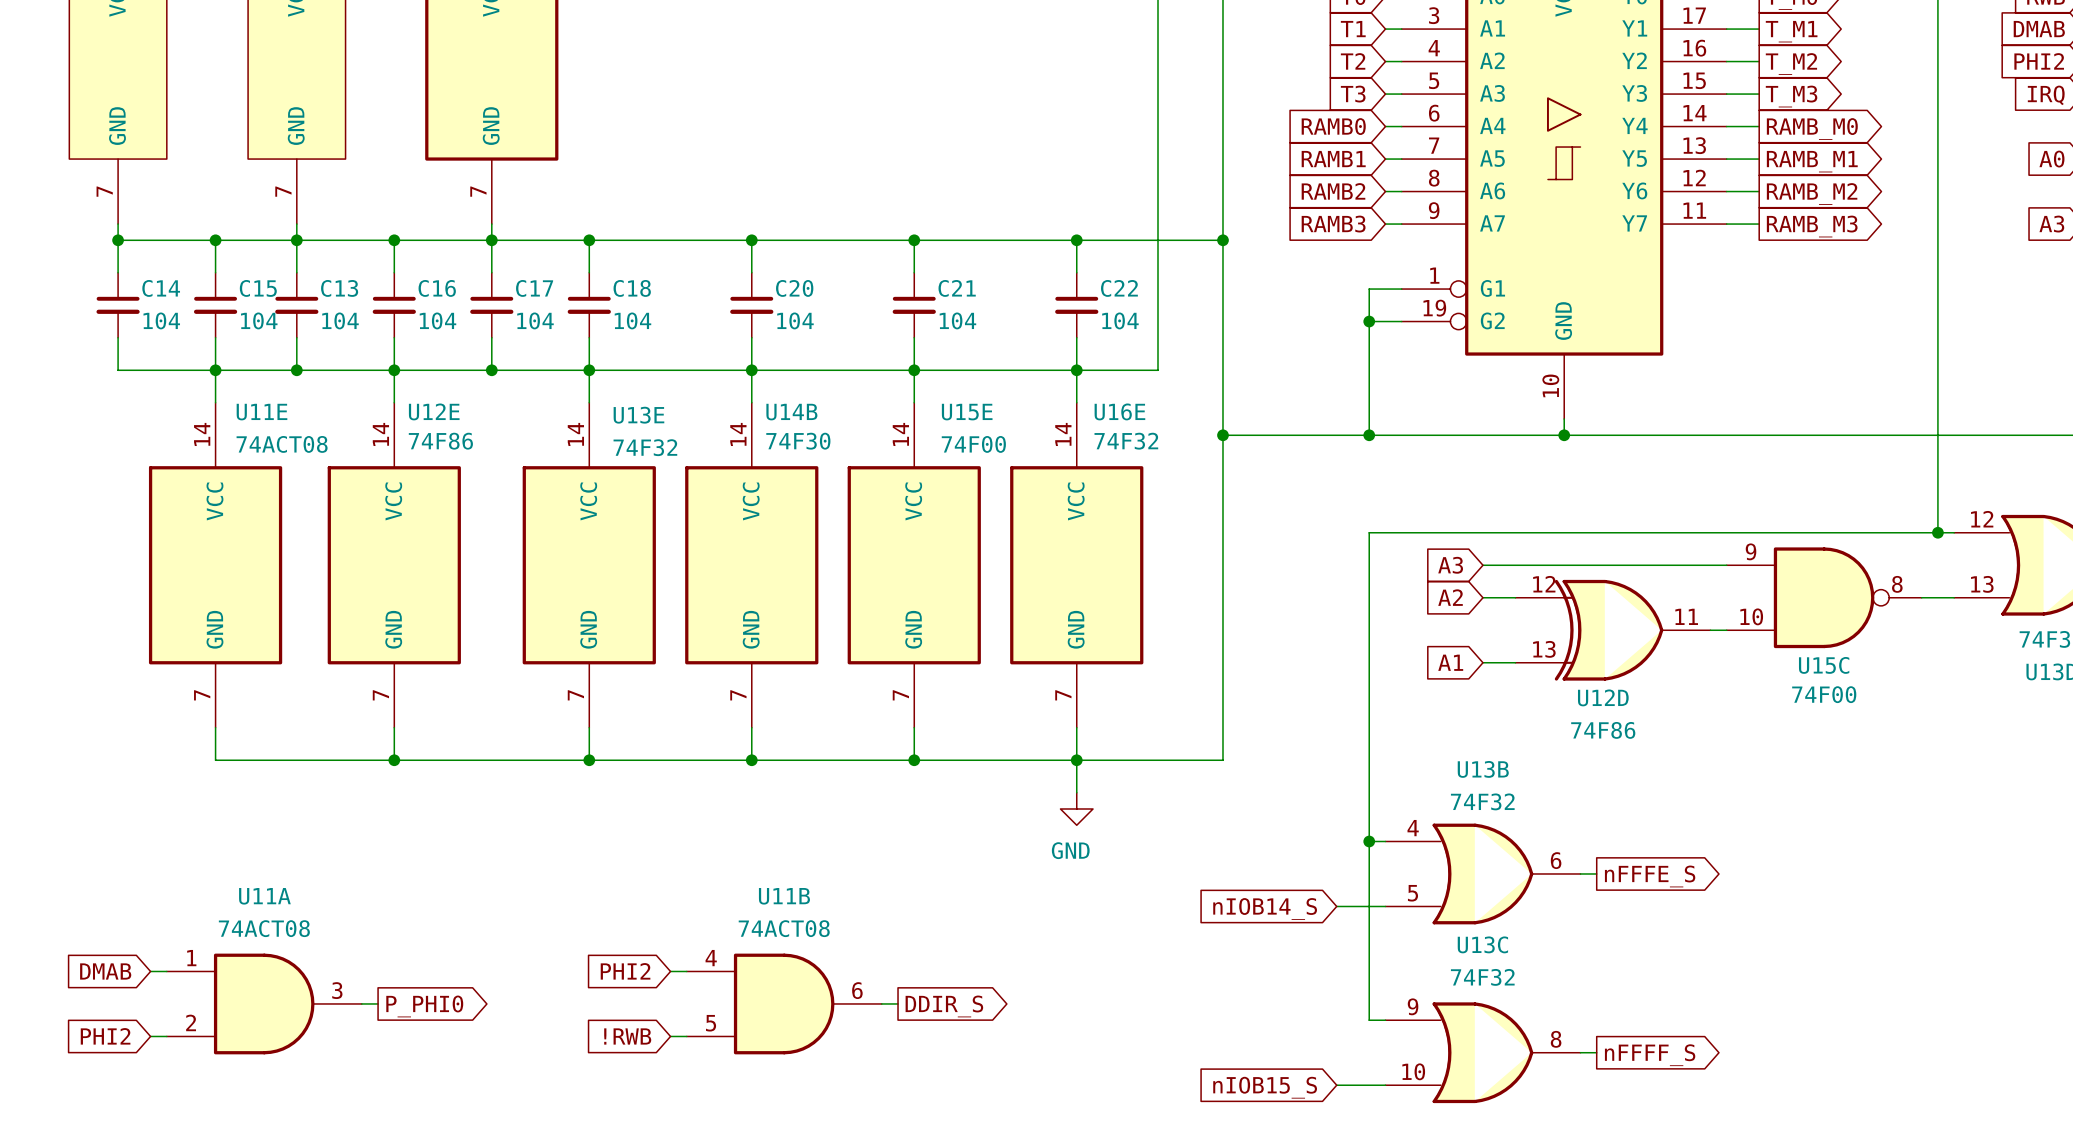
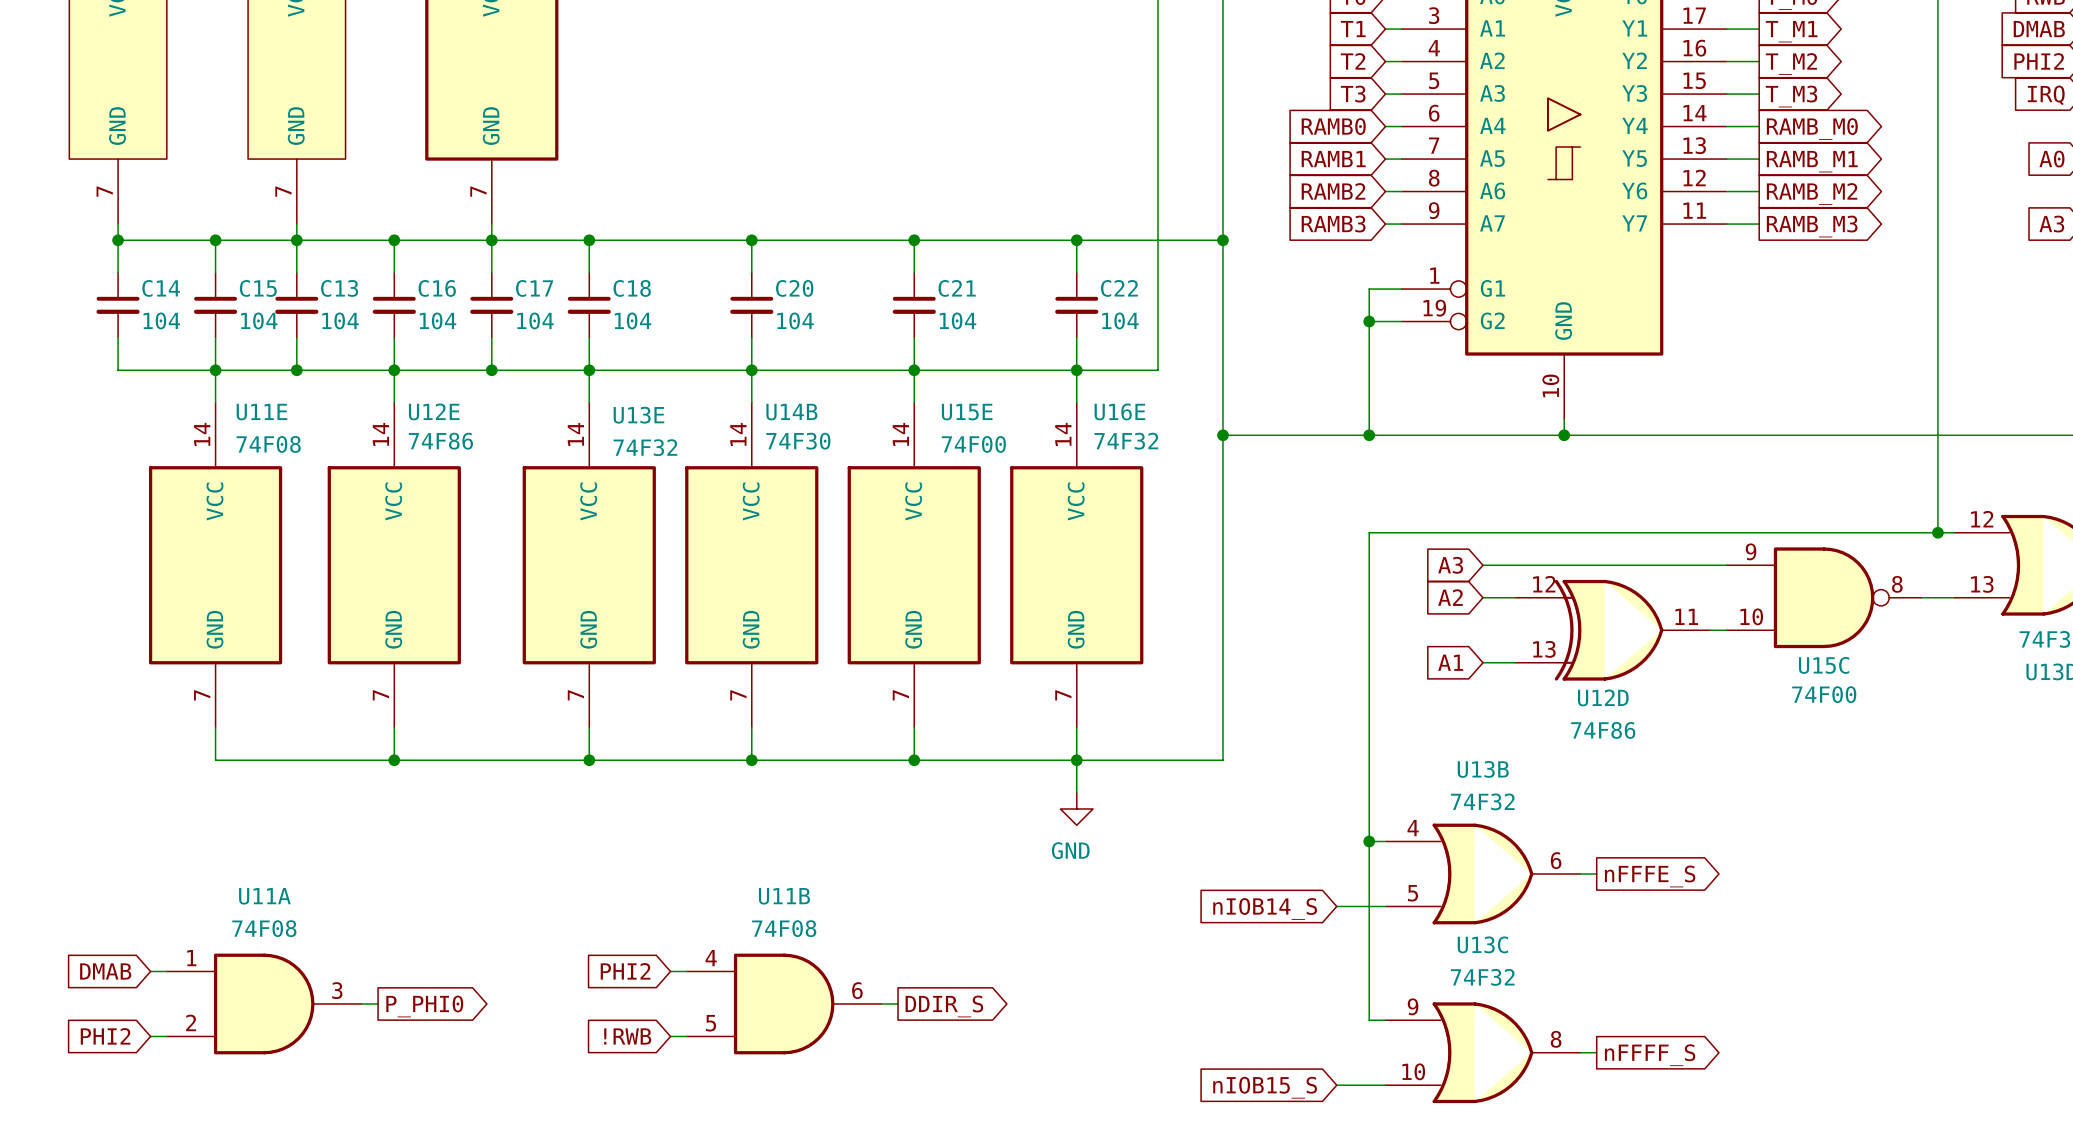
U11E value: 74ACT08 (282, 444) -> 74F08 (268, 444)
U11A value: 74ACT08 (264, 928) -> 74F08 (264, 928)
U11B value: 74ACT08 (784, 928) -> 74F08 (784, 928)

